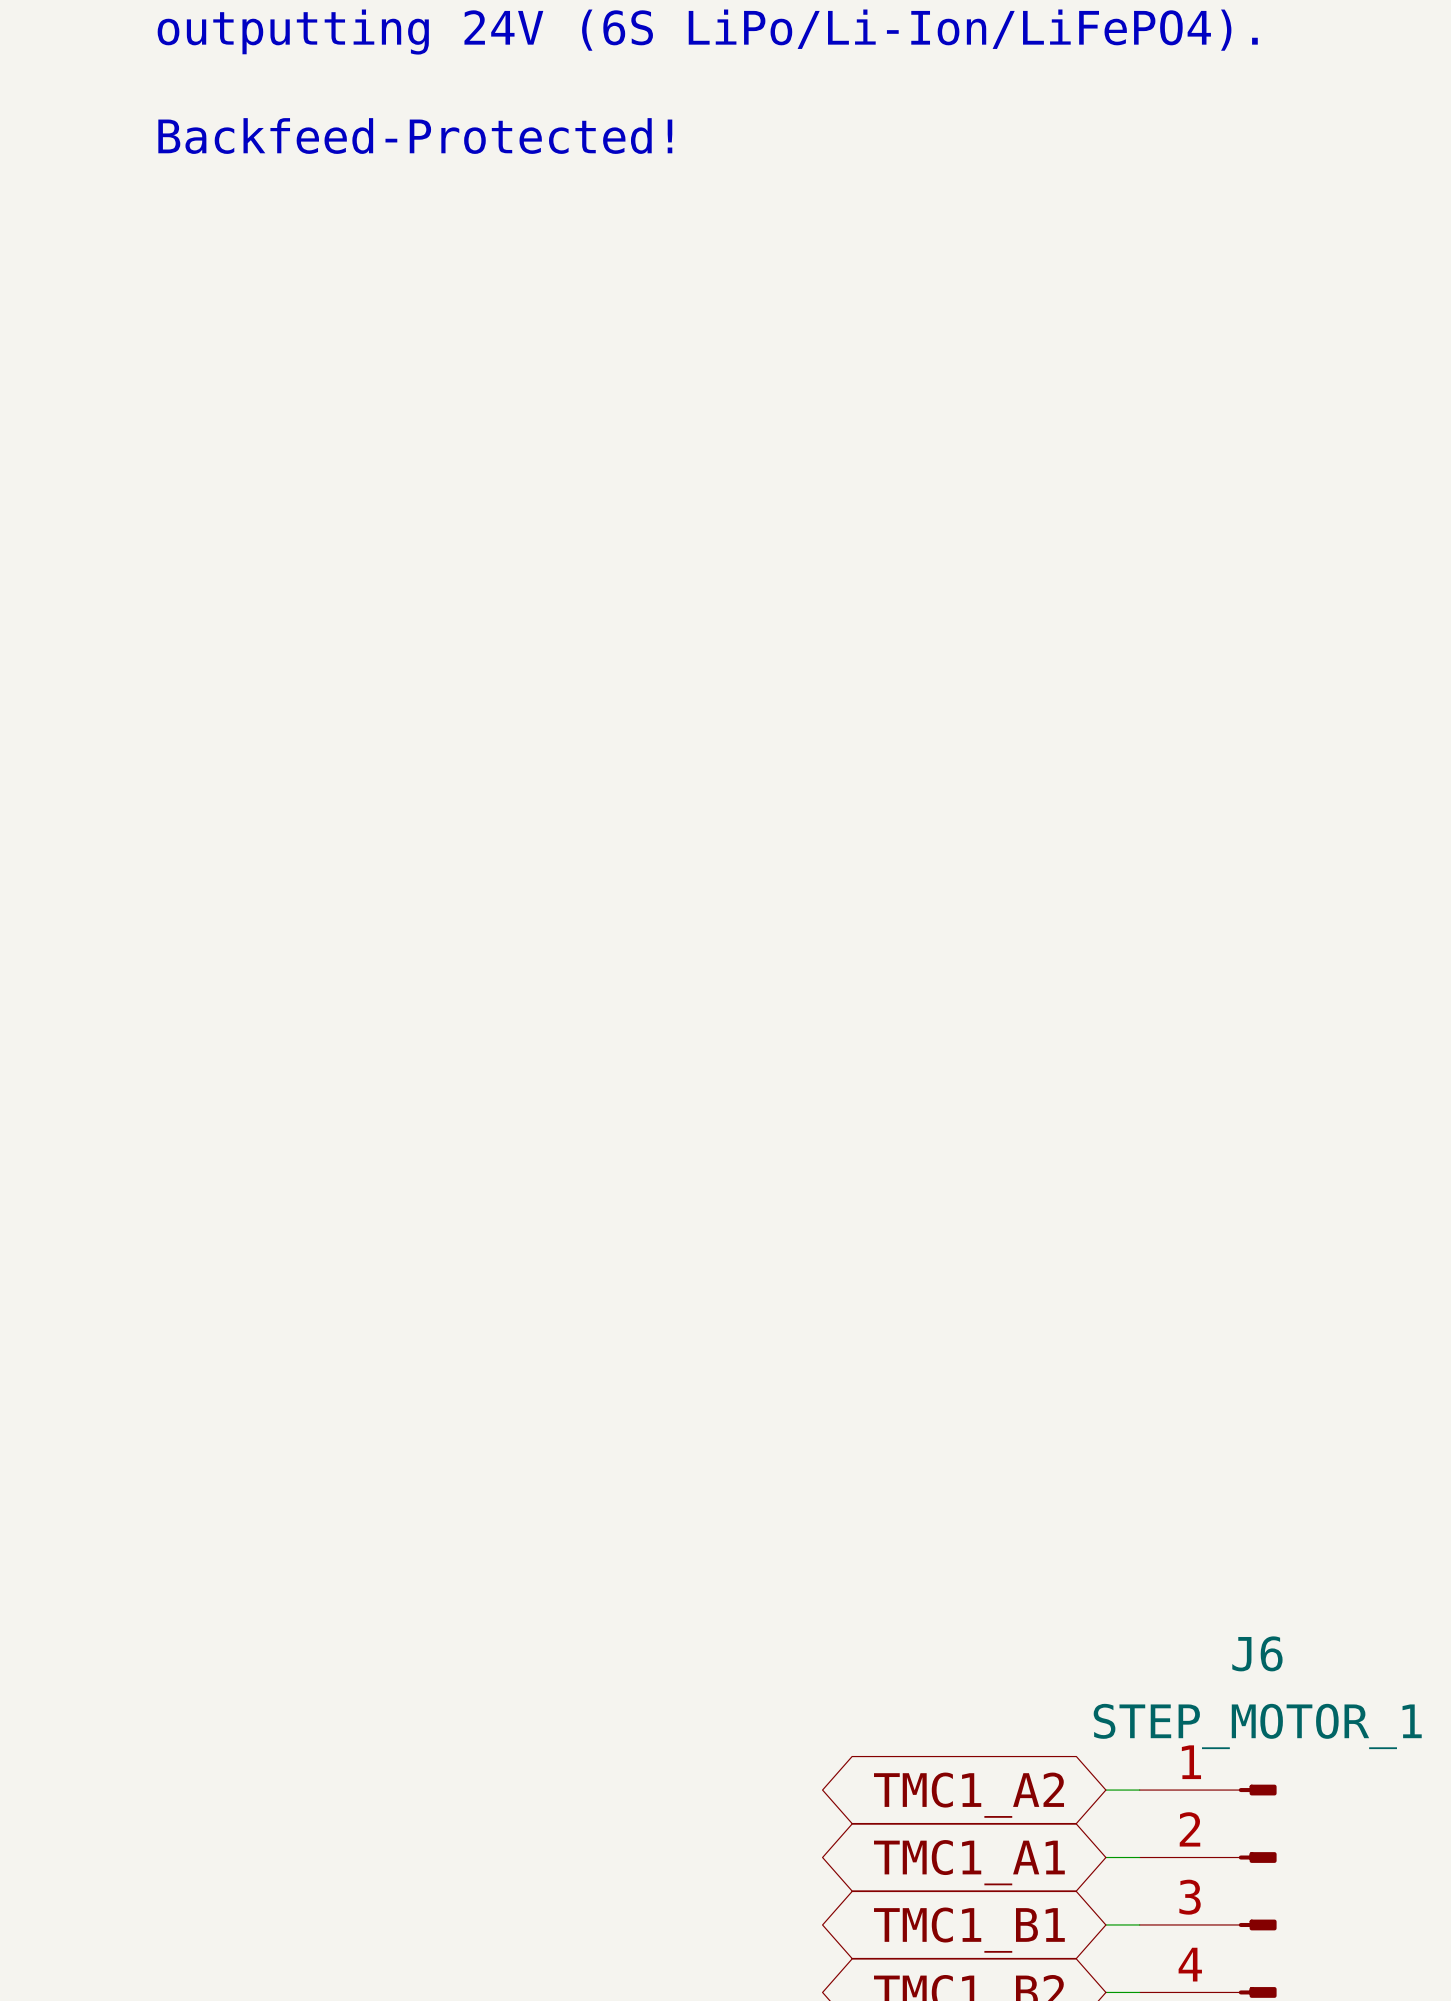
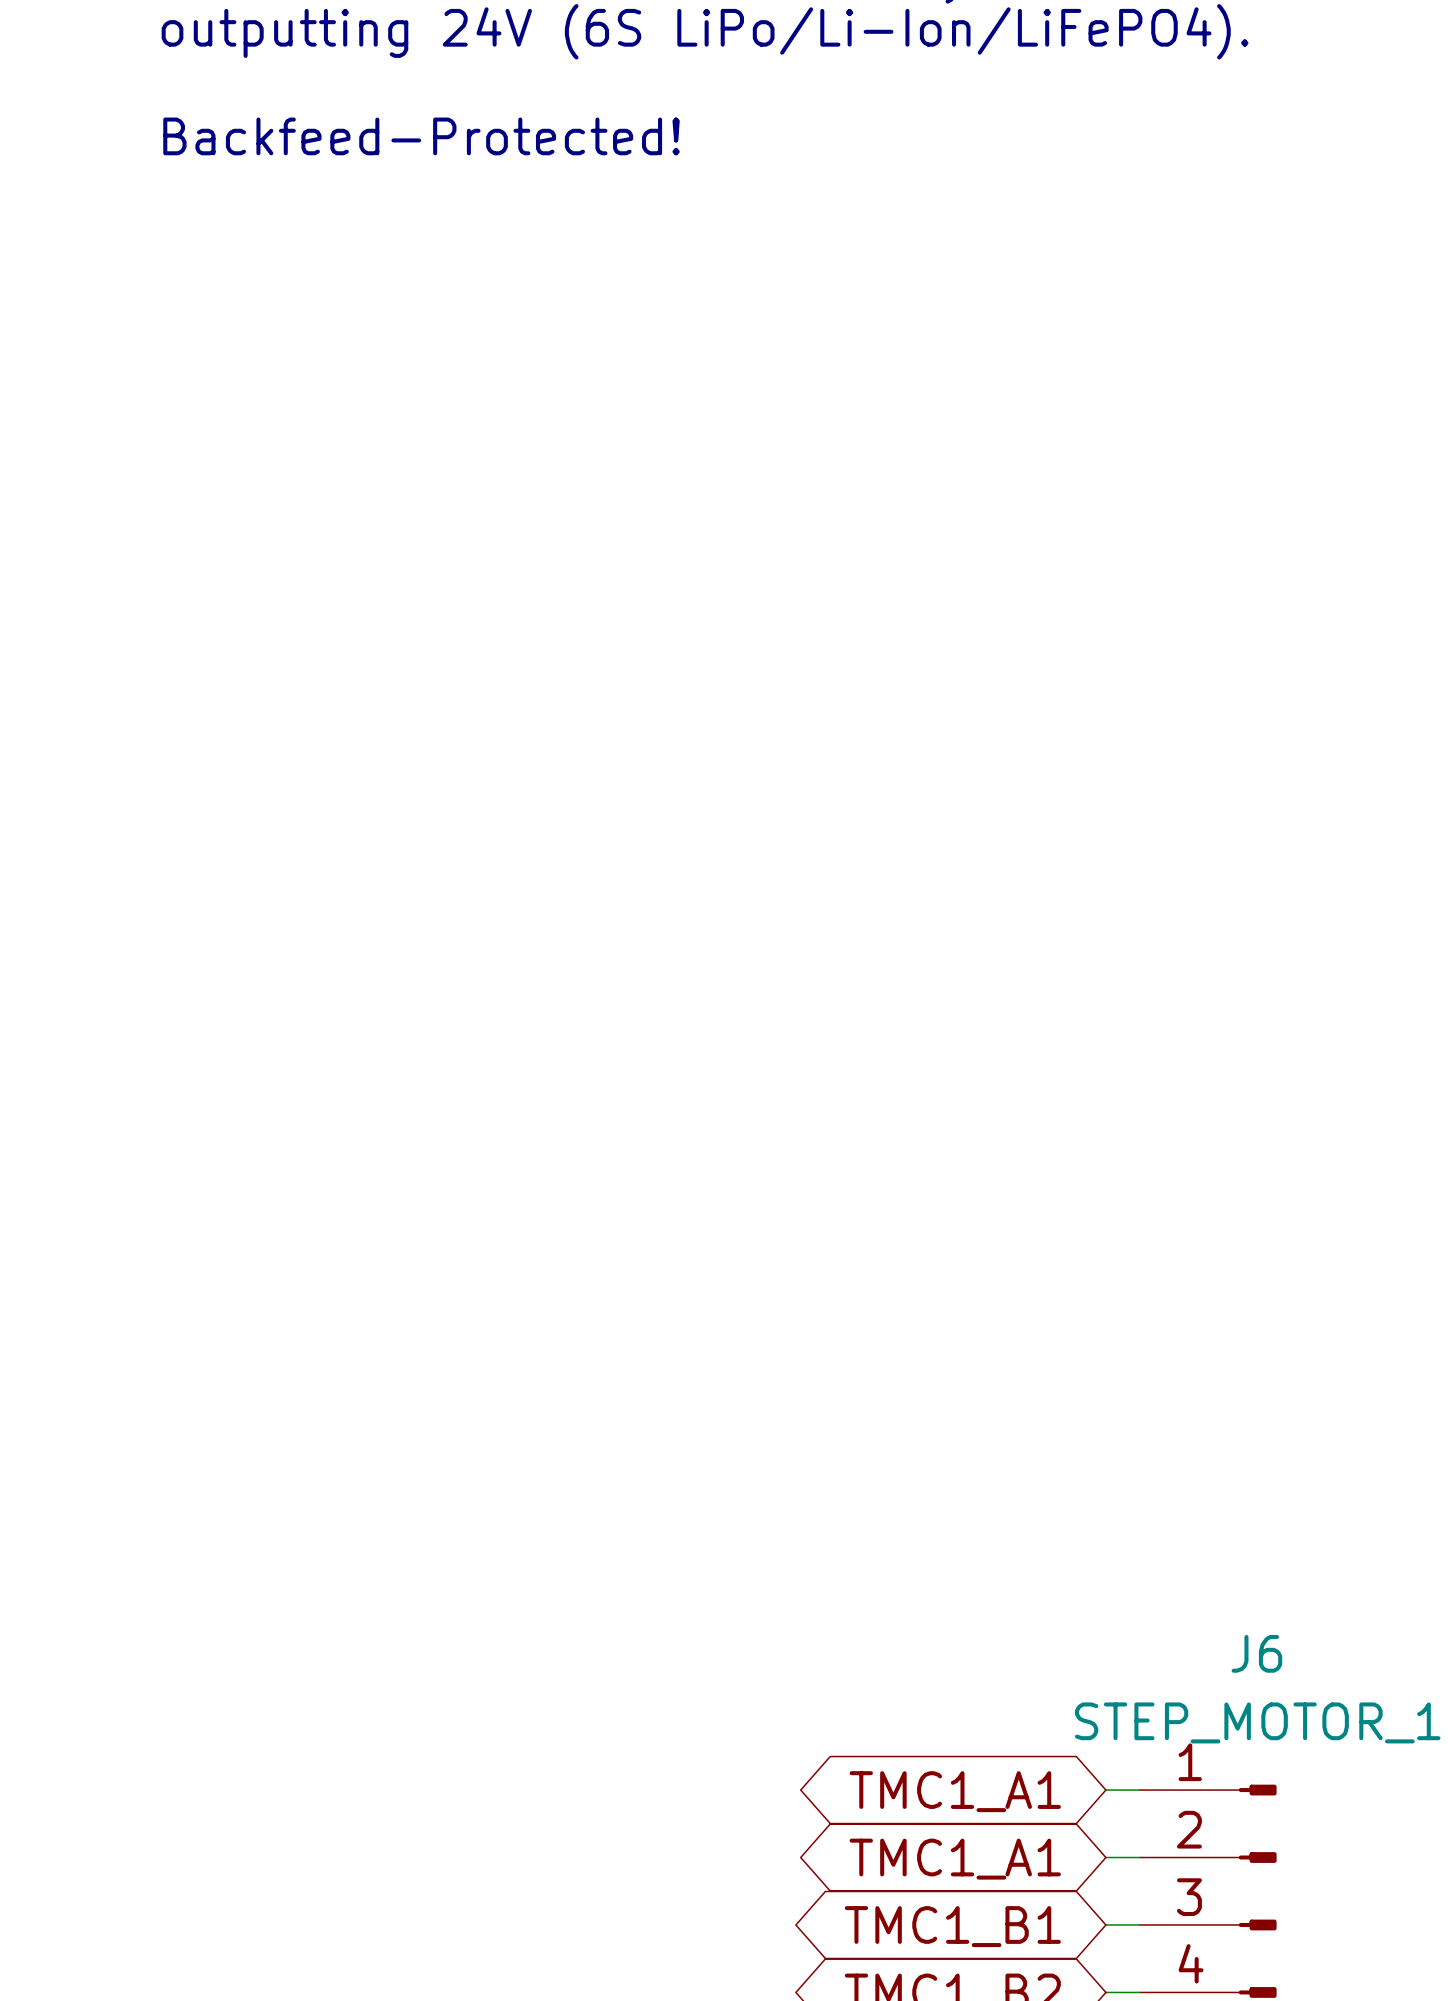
global label: TMC1_A2 (969, 1795) -> TMC1_A1 (955, 1791)

